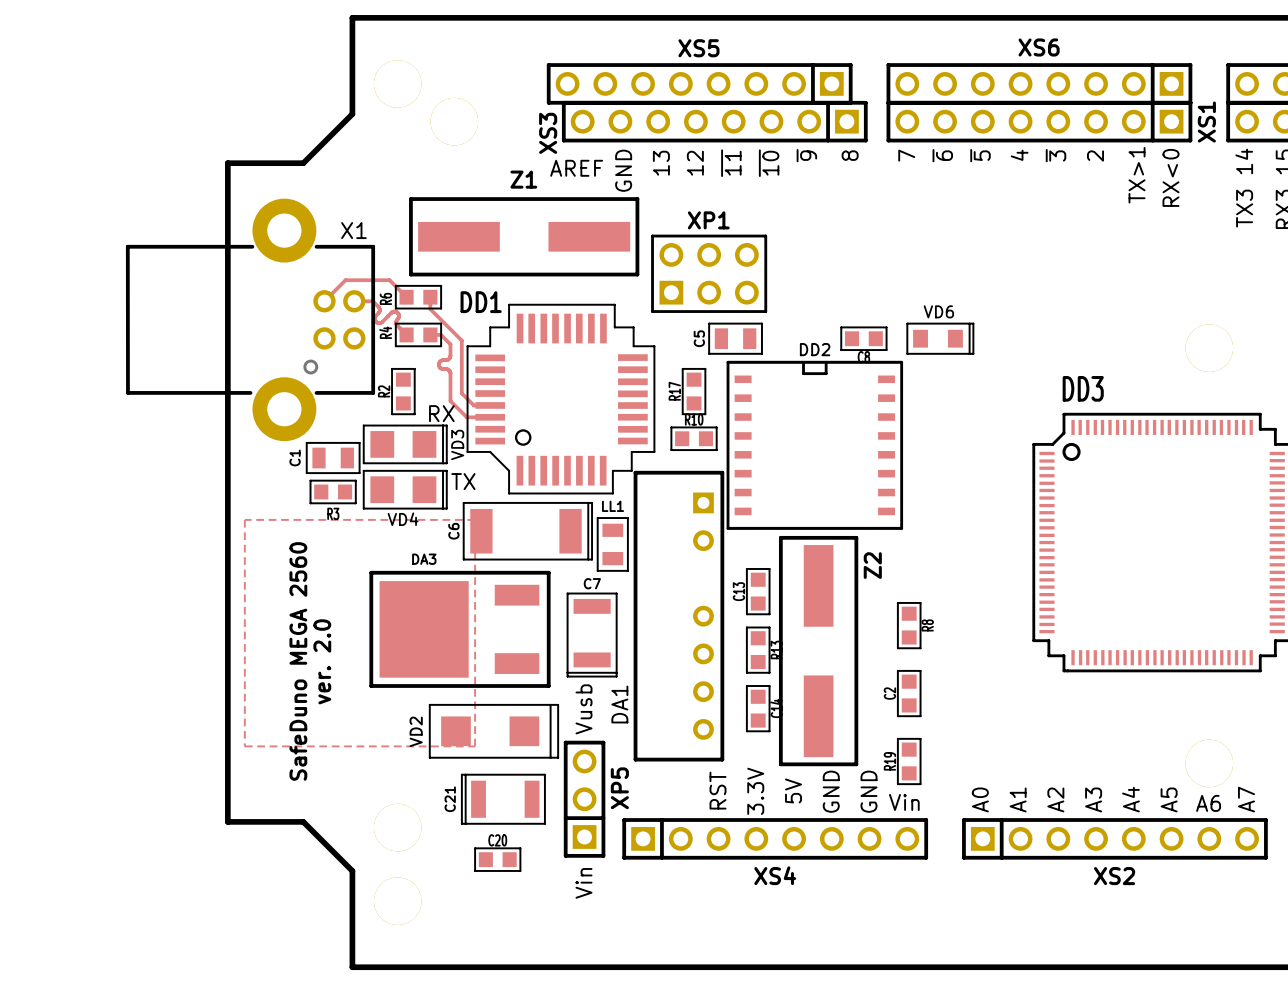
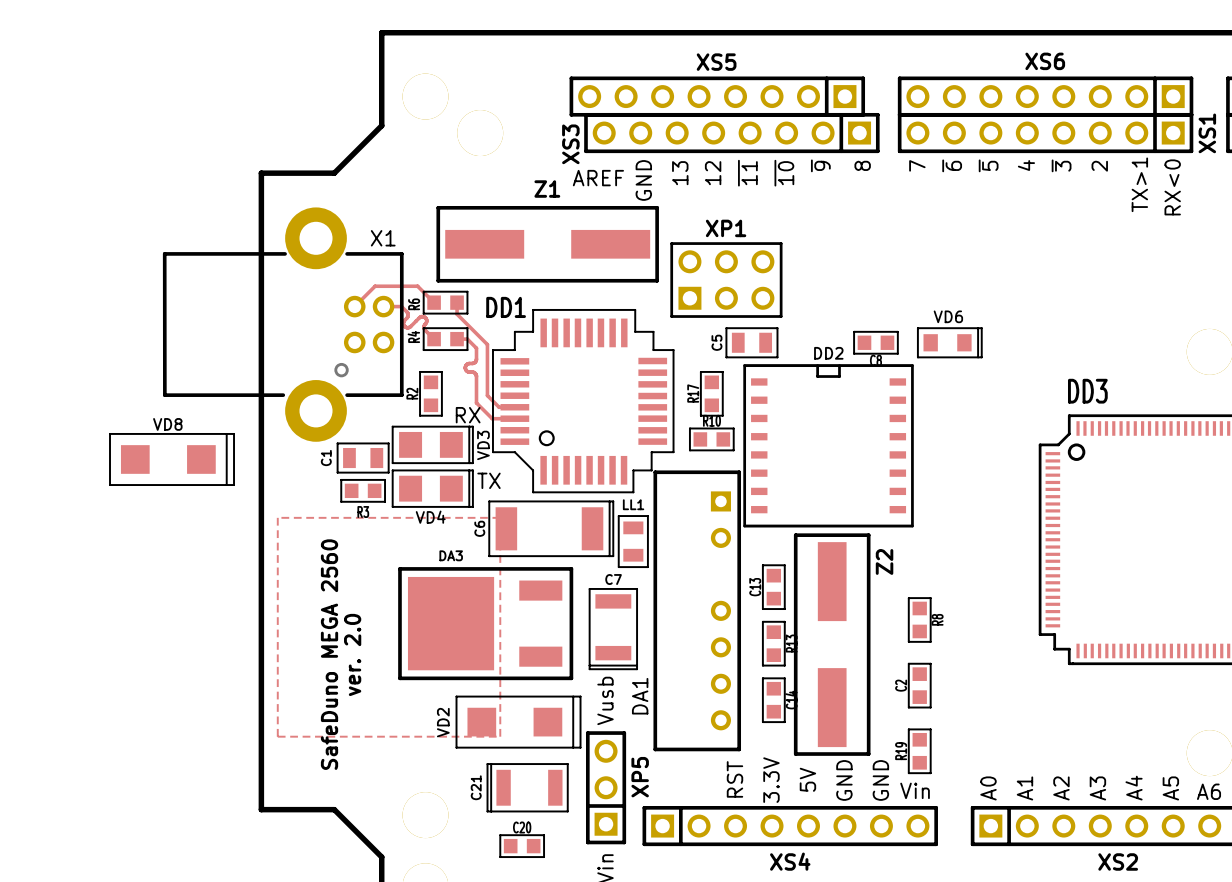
VD8: none -> (172, 459)

